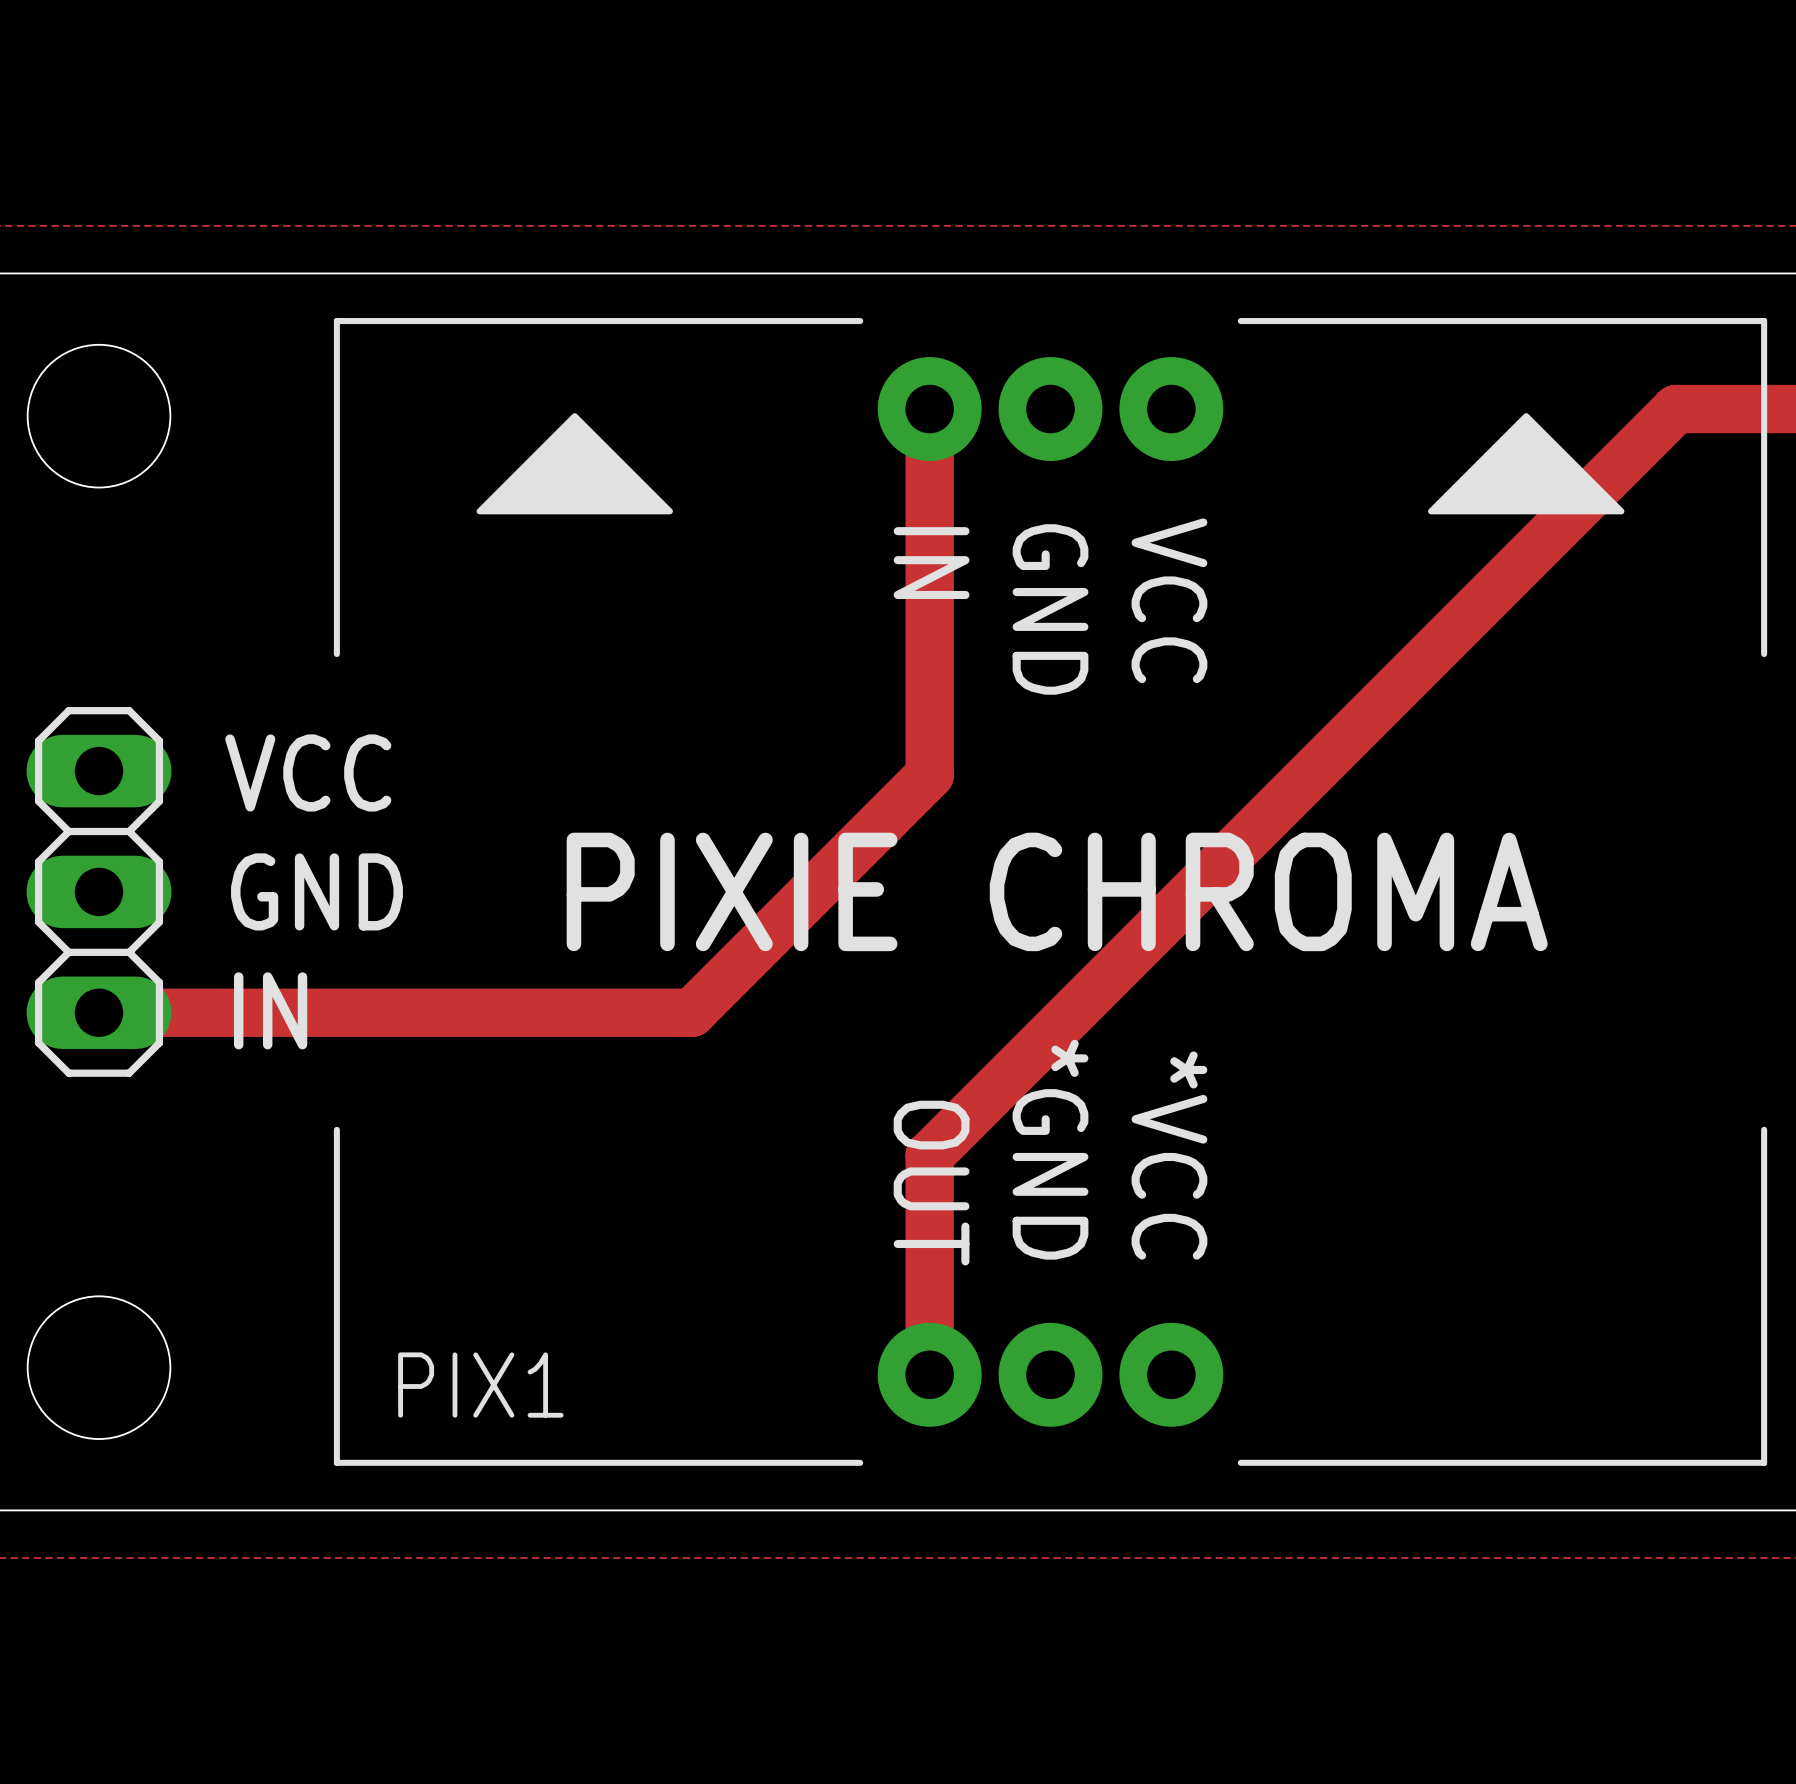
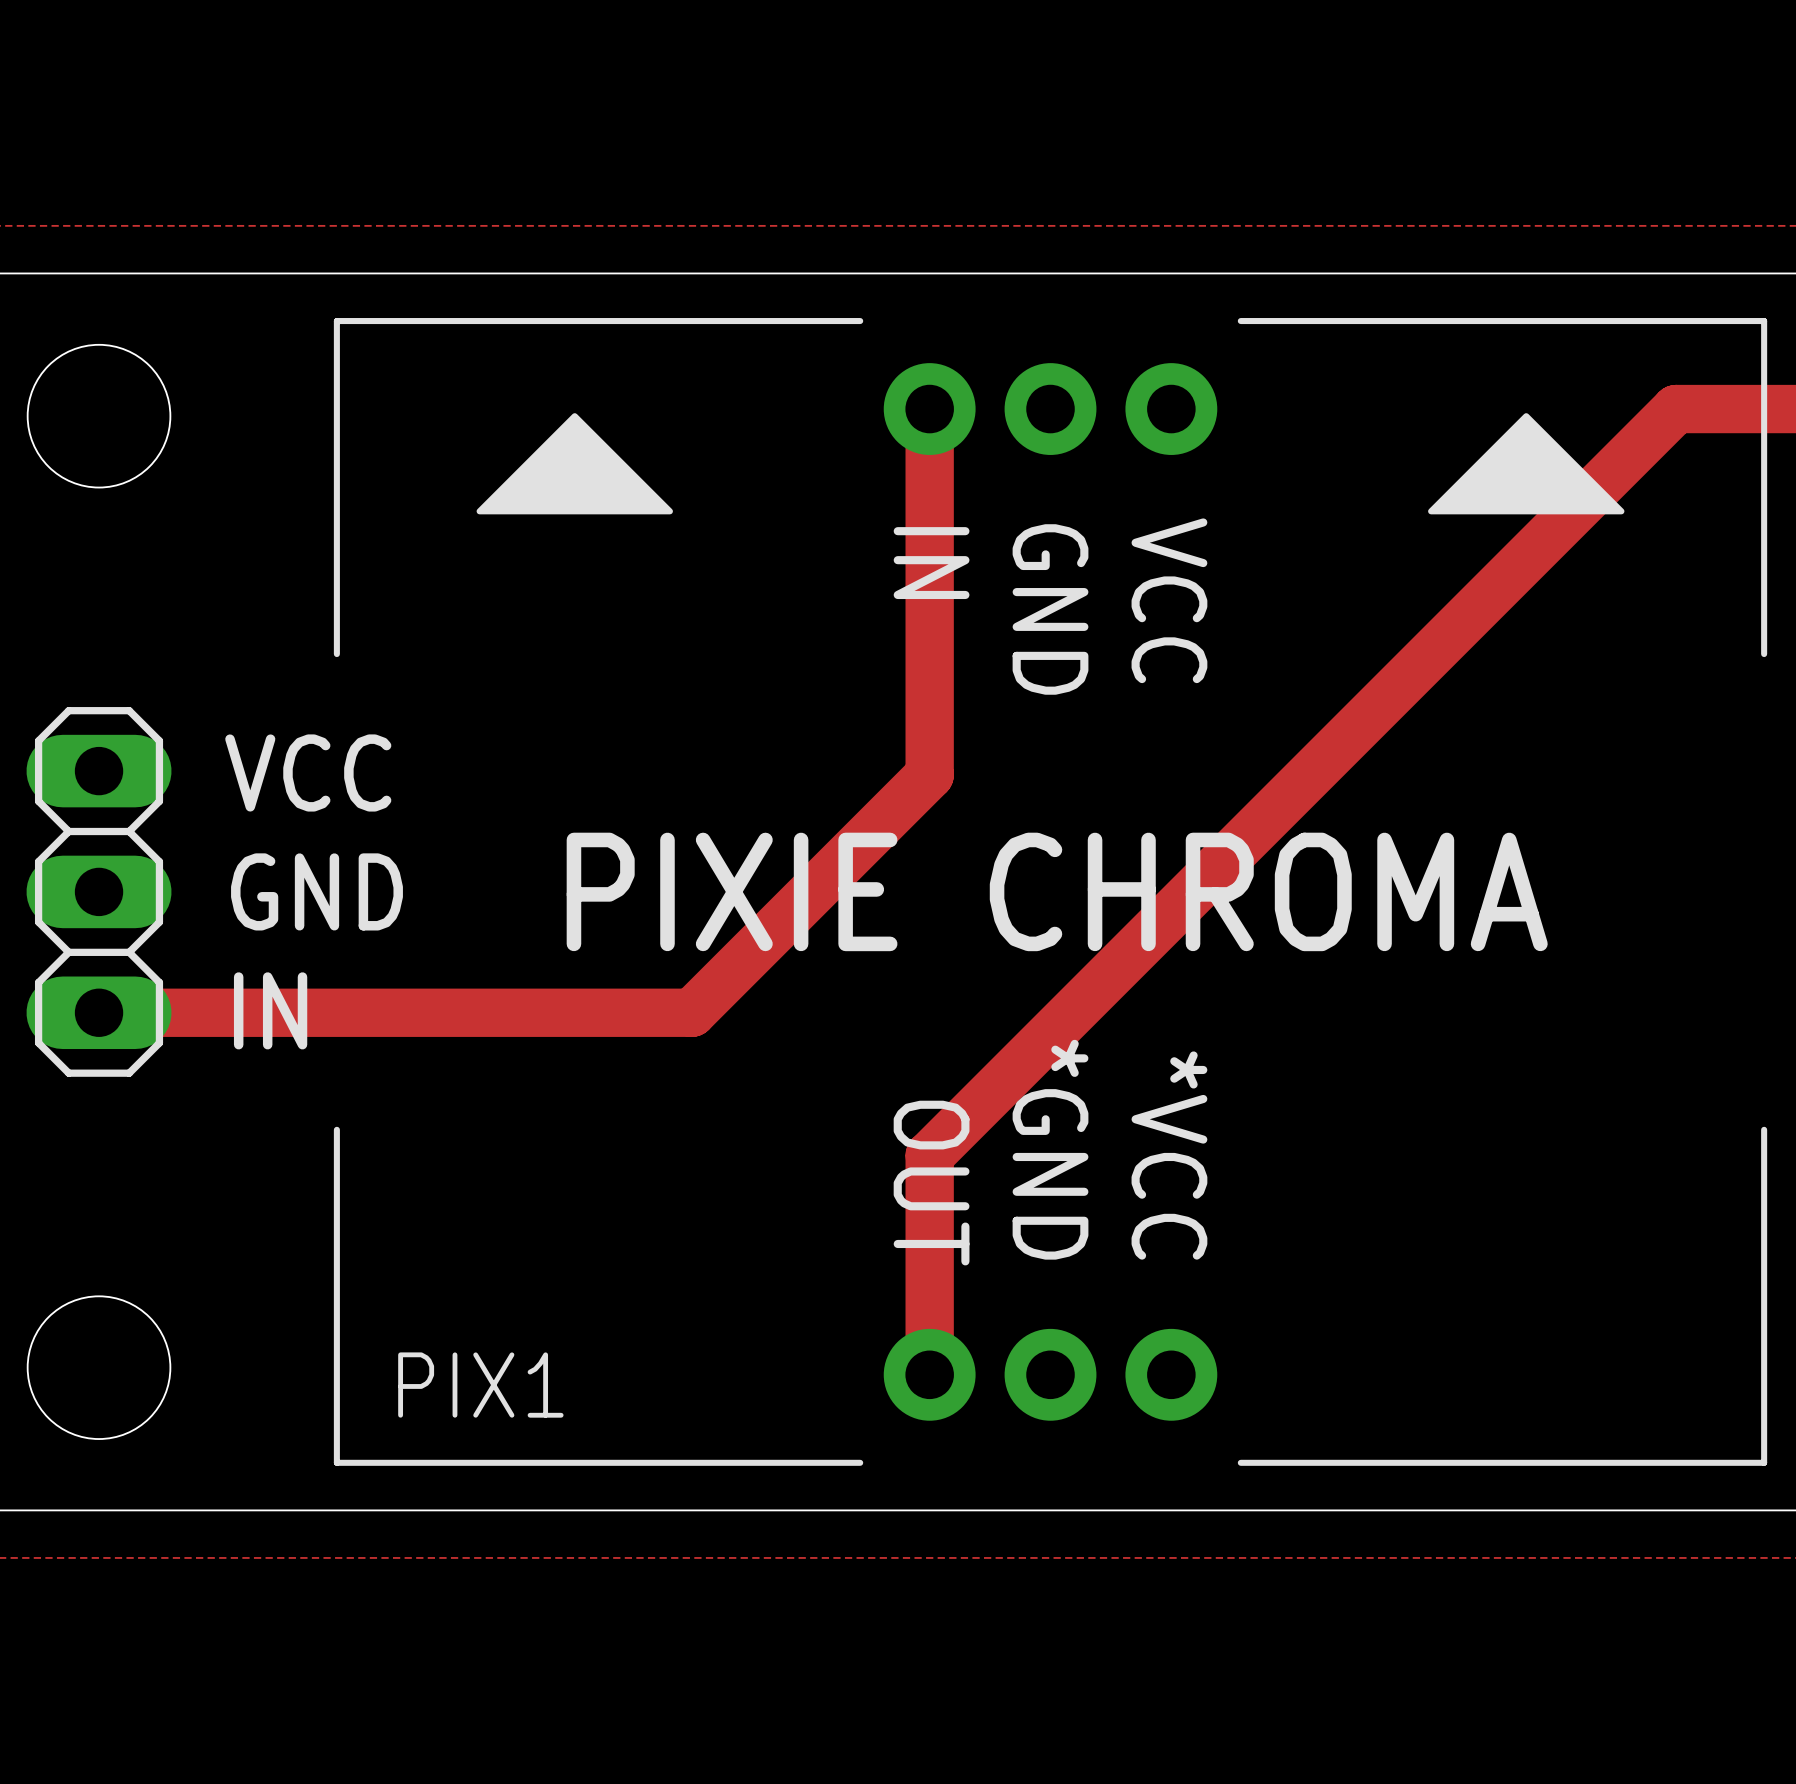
PIX1 footprint: [333, 318, 1768, 1466] -> [333, 318, 1768, 1466]

